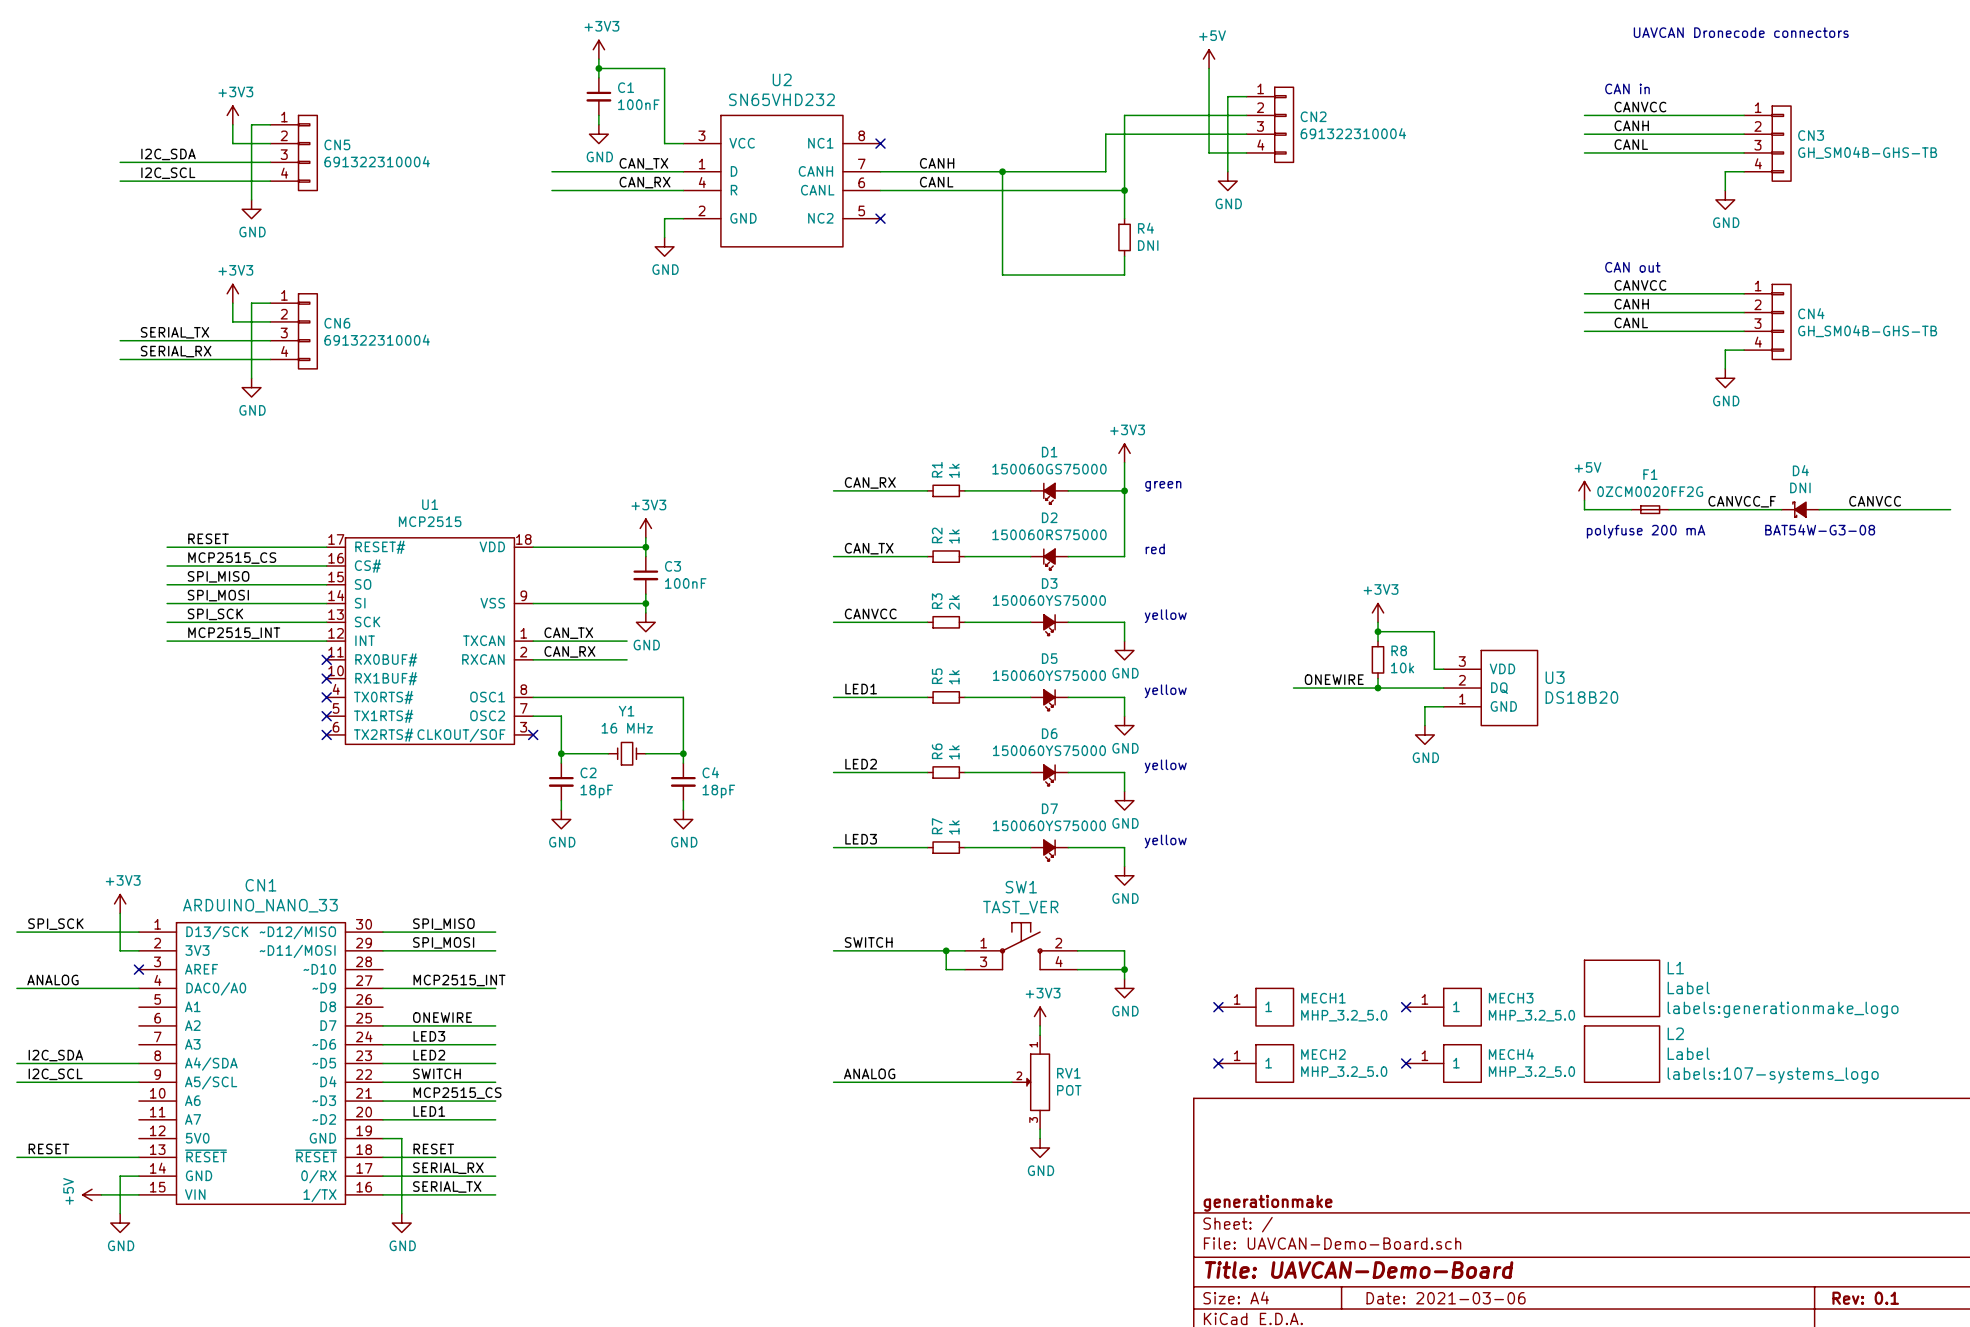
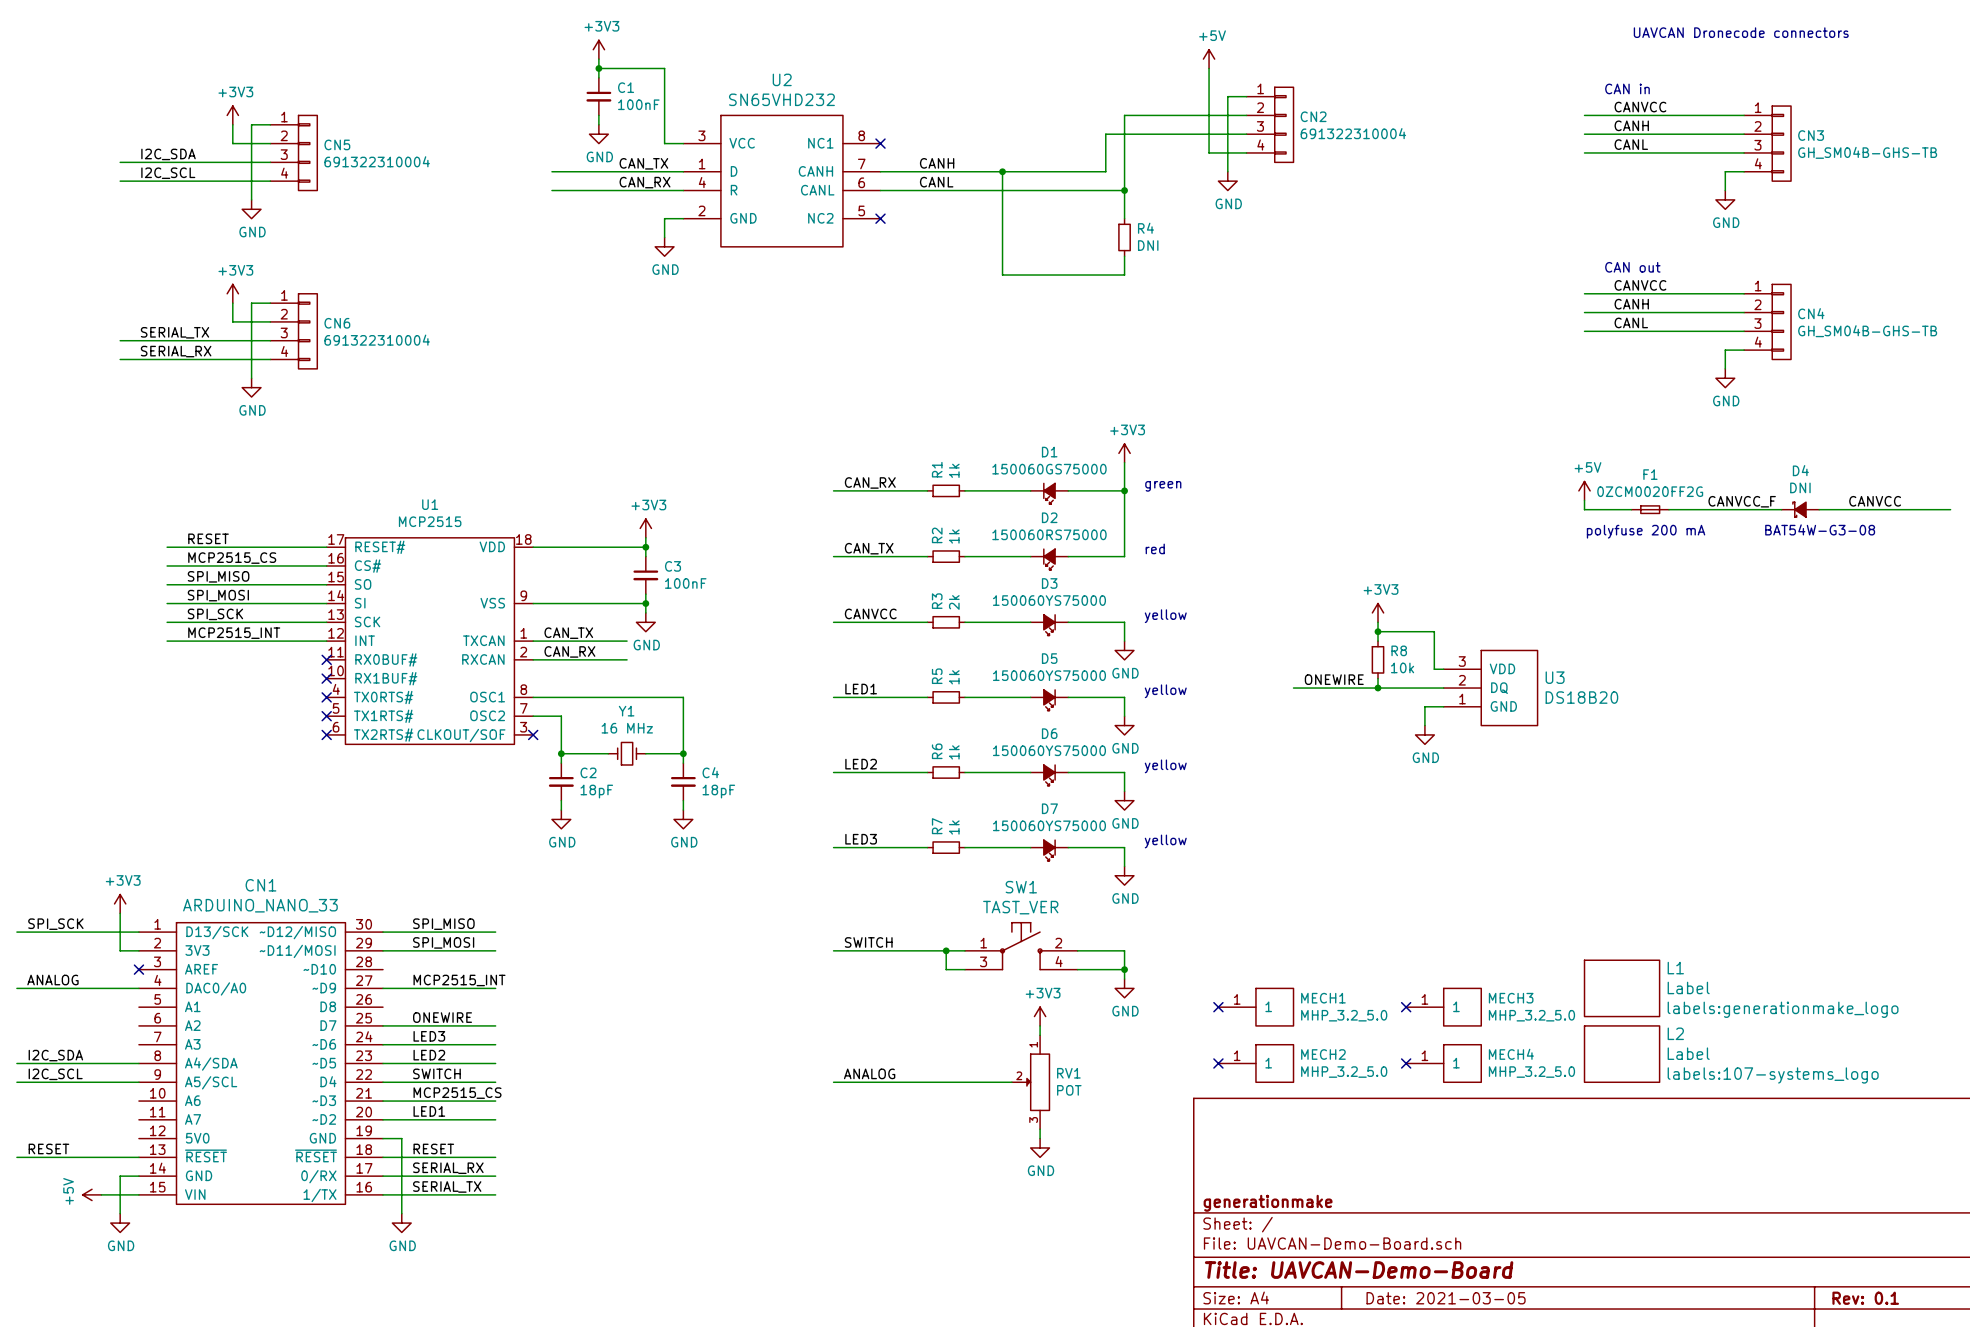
title block: Date: 2021-03-06 (1446, 1298) -> Date: 2021-03-05 (1446, 1298)

